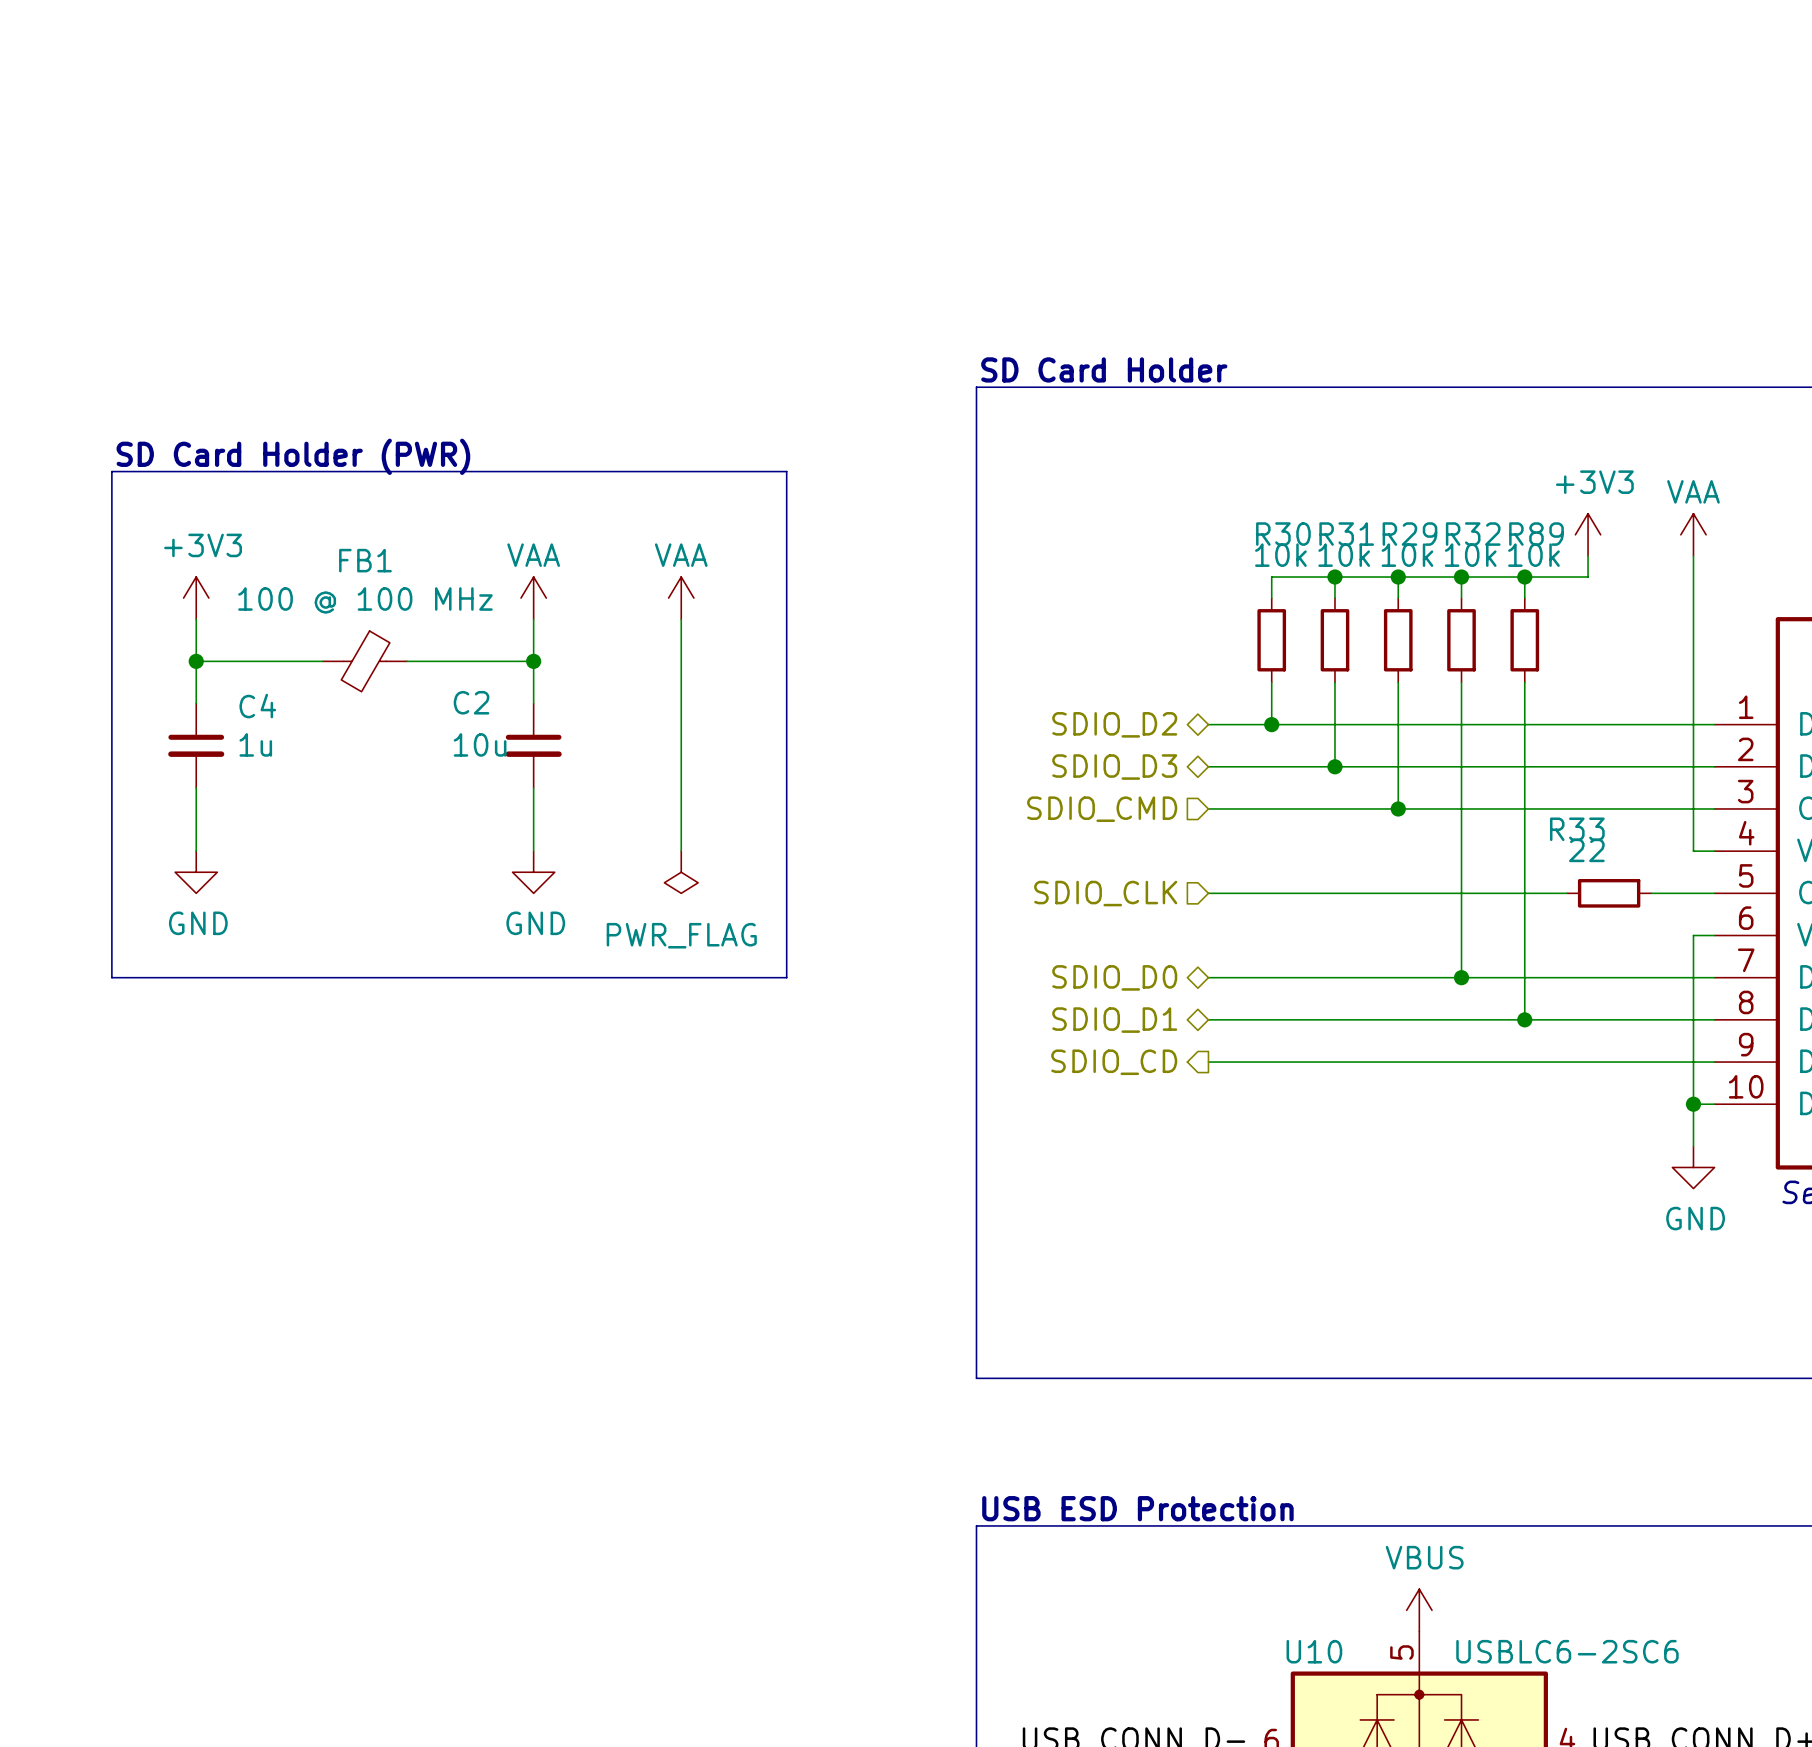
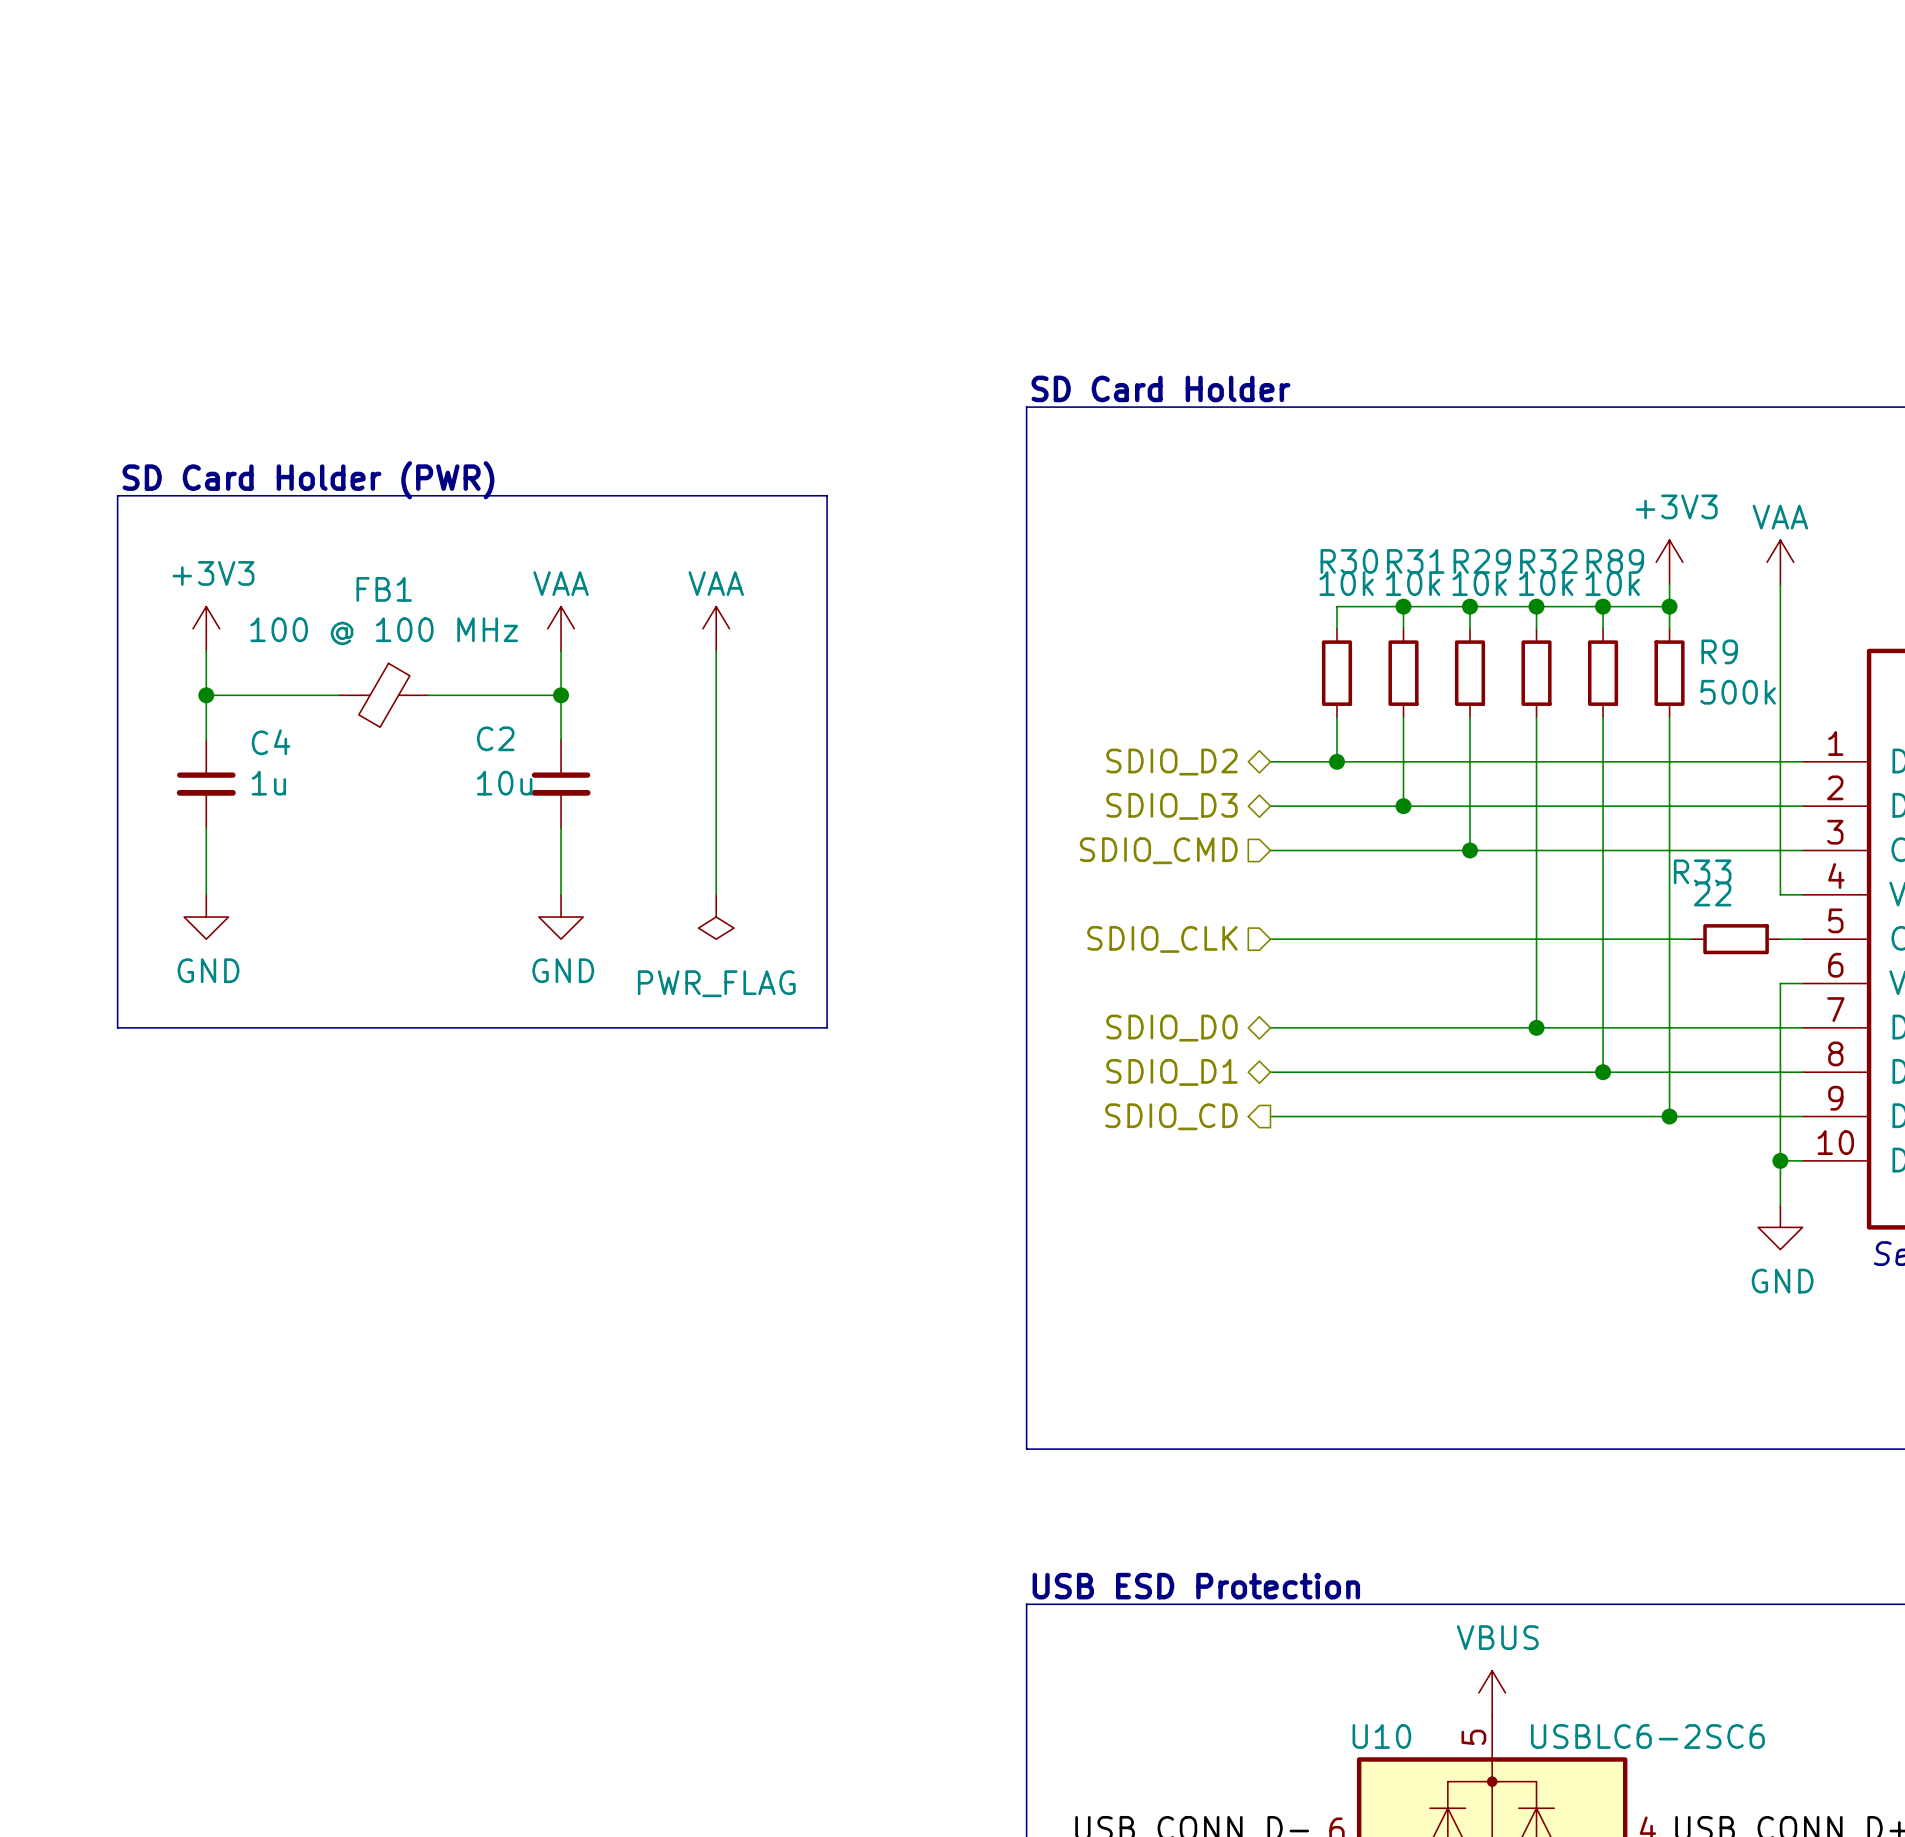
wire: none -> (1669, 606) (1669, 628)
junction: none -> (1669, 606)
R9: none -> 500k (1669, 673)
wire: none -> (1669, 717) (1669, 1116)
R33 position: (1609, 893) -> (1736, 939)
wire: (1651, 893) (1693, 893) -> (1647, 939) (1691, 939)
junction: none -> (1669, 1116)

